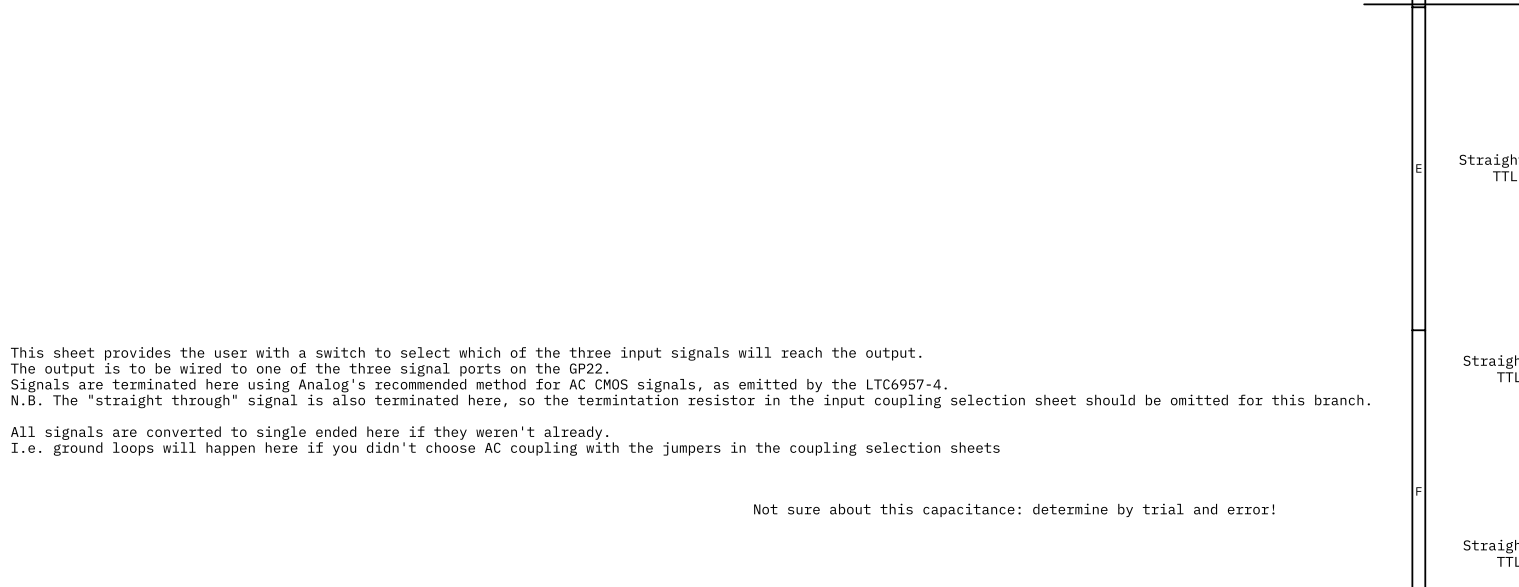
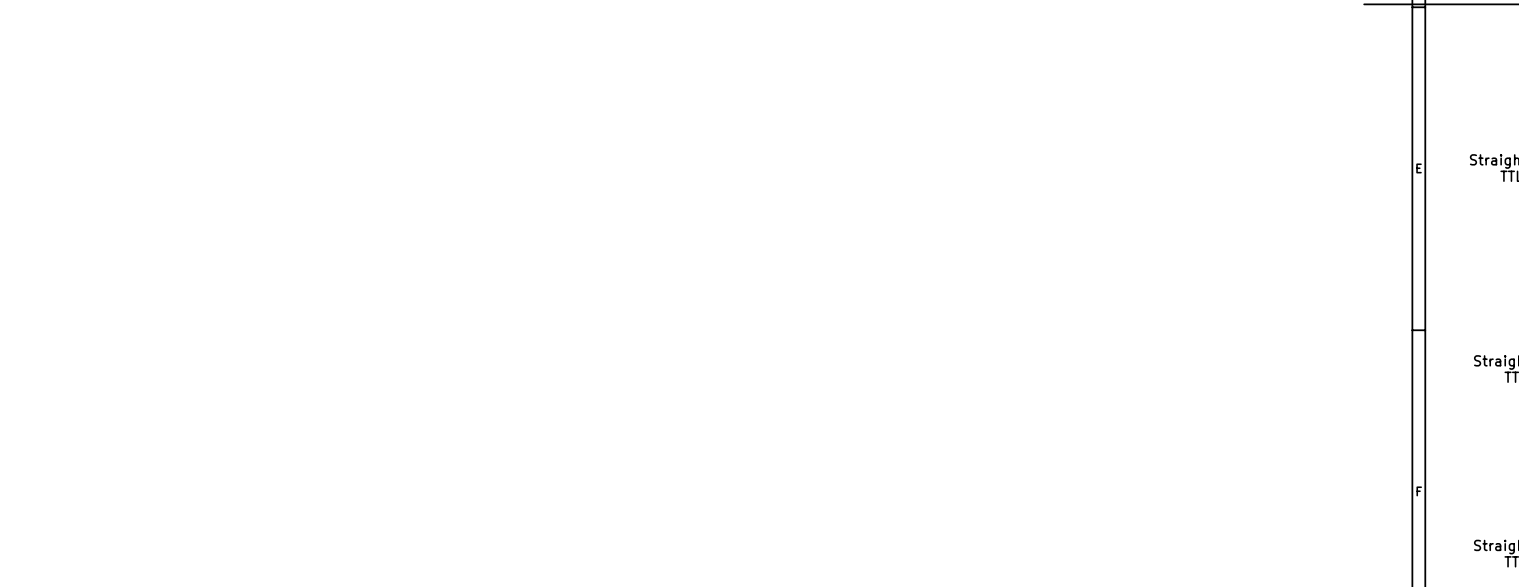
text: This sheet provides the user with a switch to select which of the three input signals will reach the output. (466, 353) -> none
text: The output is to be wired to one of the three signal ports on the GP22. (309, 369) -> none
text: Signals are terminated here using Analog's recommended method for AC CMOS signals, as emitted by the LTC6957-4. (478, 385) -> none
text: N.B. The "straight through" signal is also terminated here, so the termintation resistor in the input coupling selection sheet should be omitted for this branch. (690, 401) -> none
text: All signals are converted to single ended here if they weren't already. (309, 433) -> none
text: I.e. ground loops will happen here if you didn't choose AC coupling with the jumpers in the coupling selection sheets (505, 448) -> none
text: Not sure about this capacitance: determine by trial and error! (1014, 510) -> none

